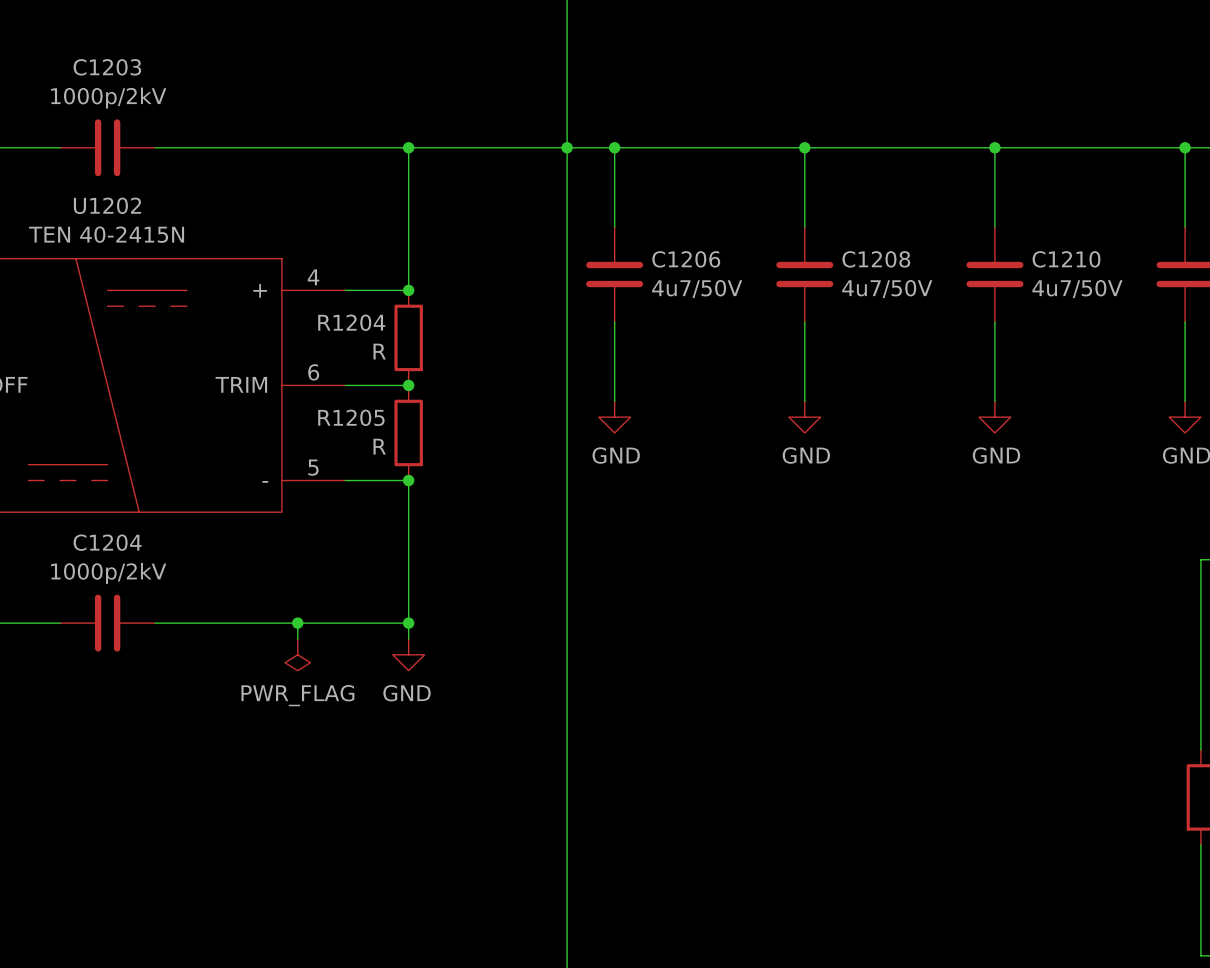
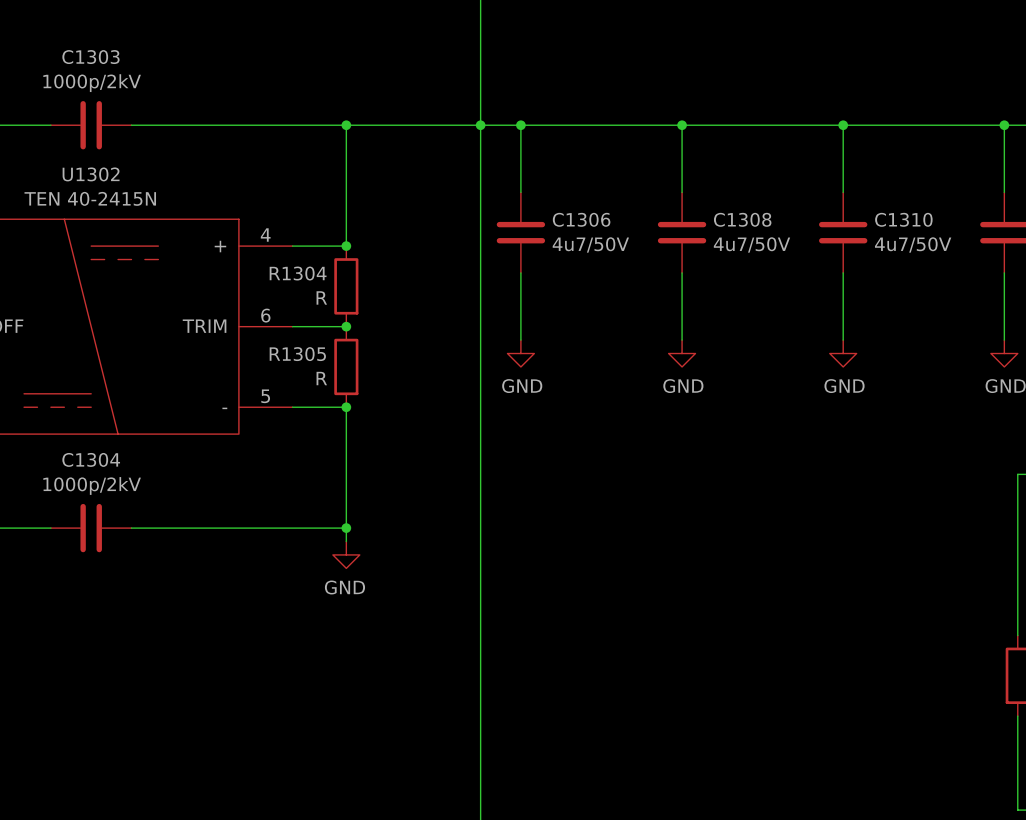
C1203 name: C1203 (107, 67) -> C1303 (90, 57)
U1202 name: U1202 (107, 205) -> U1302 (91, 174)
C1206 name: C1206 (686, 259) -> C1306 (581, 219)
C1208 name: C1208 (876, 259) -> C1308 (742, 219)
C1210 name: C1210 (1066, 259) -> C1310 (903, 219)
R1204 name: R1204 (351, 322) -> R1304 (298, 273)
R1205 name: R1205 (351, 417) -> R1305 (297, 354)
C1204 name: C1204 (107, 542) -> C1304 (91, 459)
wire: (297, 623) (297, 638) -> none
junction: (297, 623) -> none
power symbol: PWR_FLAG (297, 654) -> none

